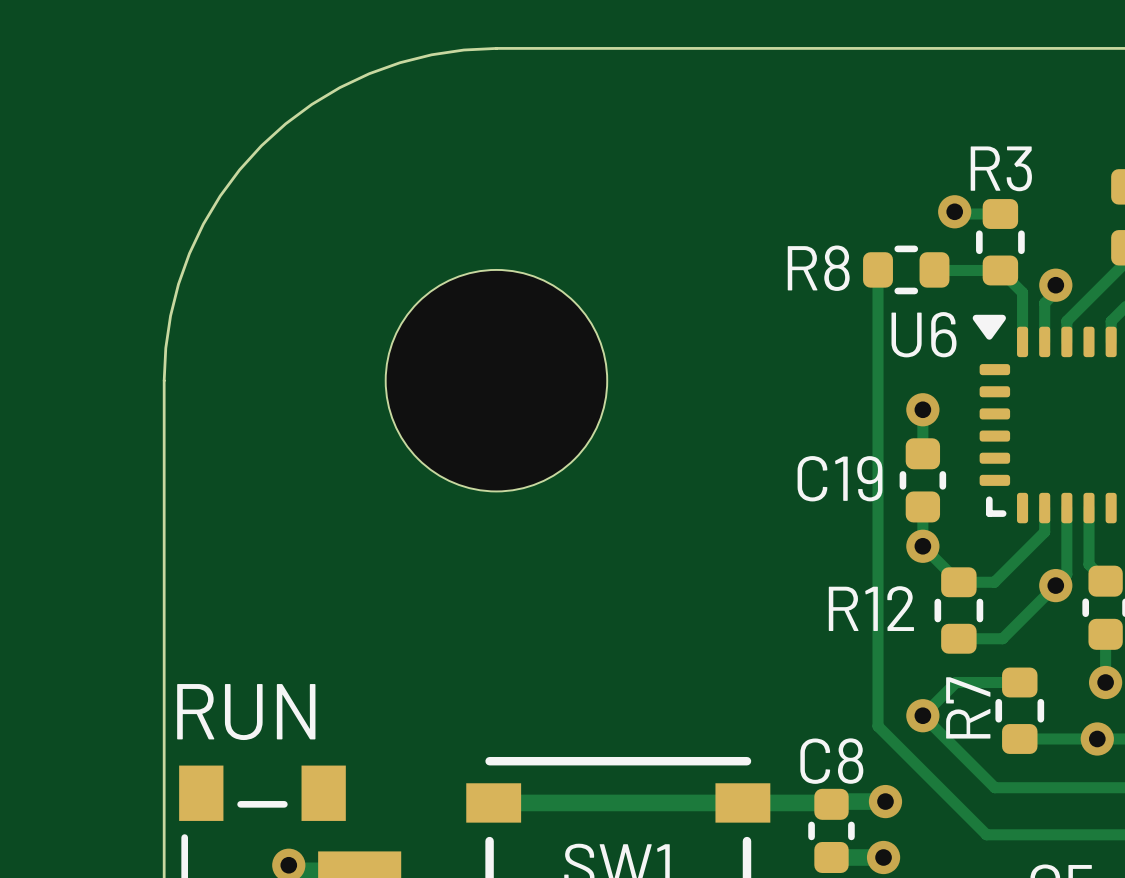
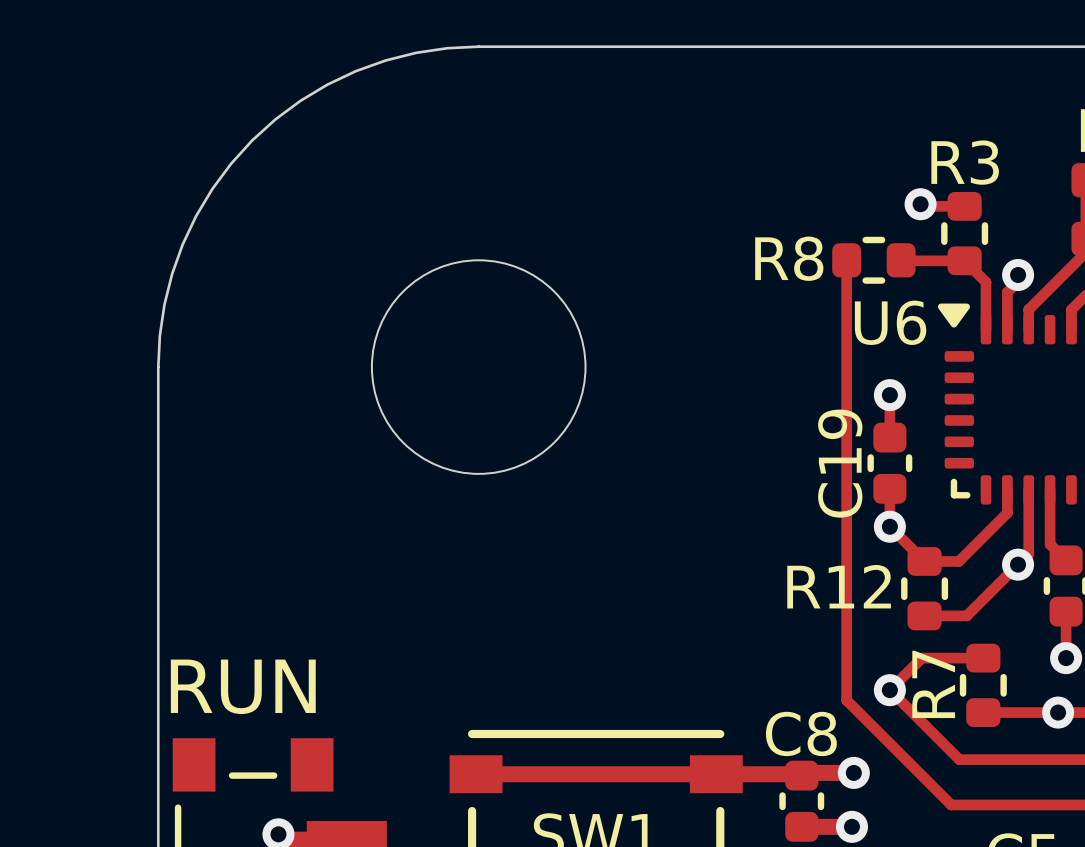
C19 name rotation: 0° (840, 478) -> 90° counterclockwise (840, 463)

